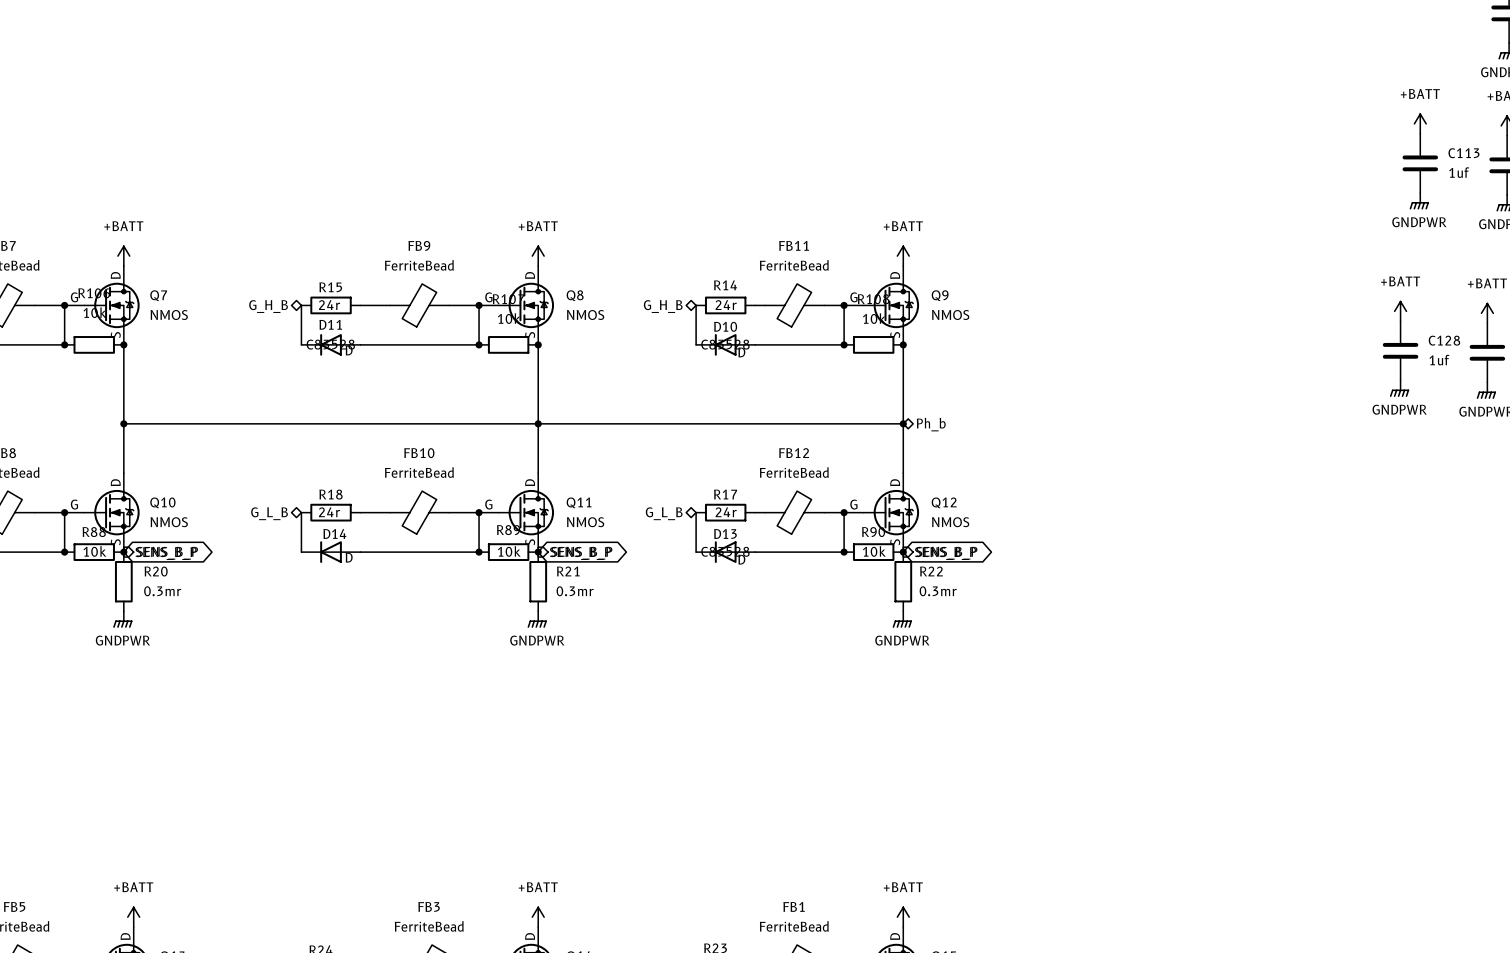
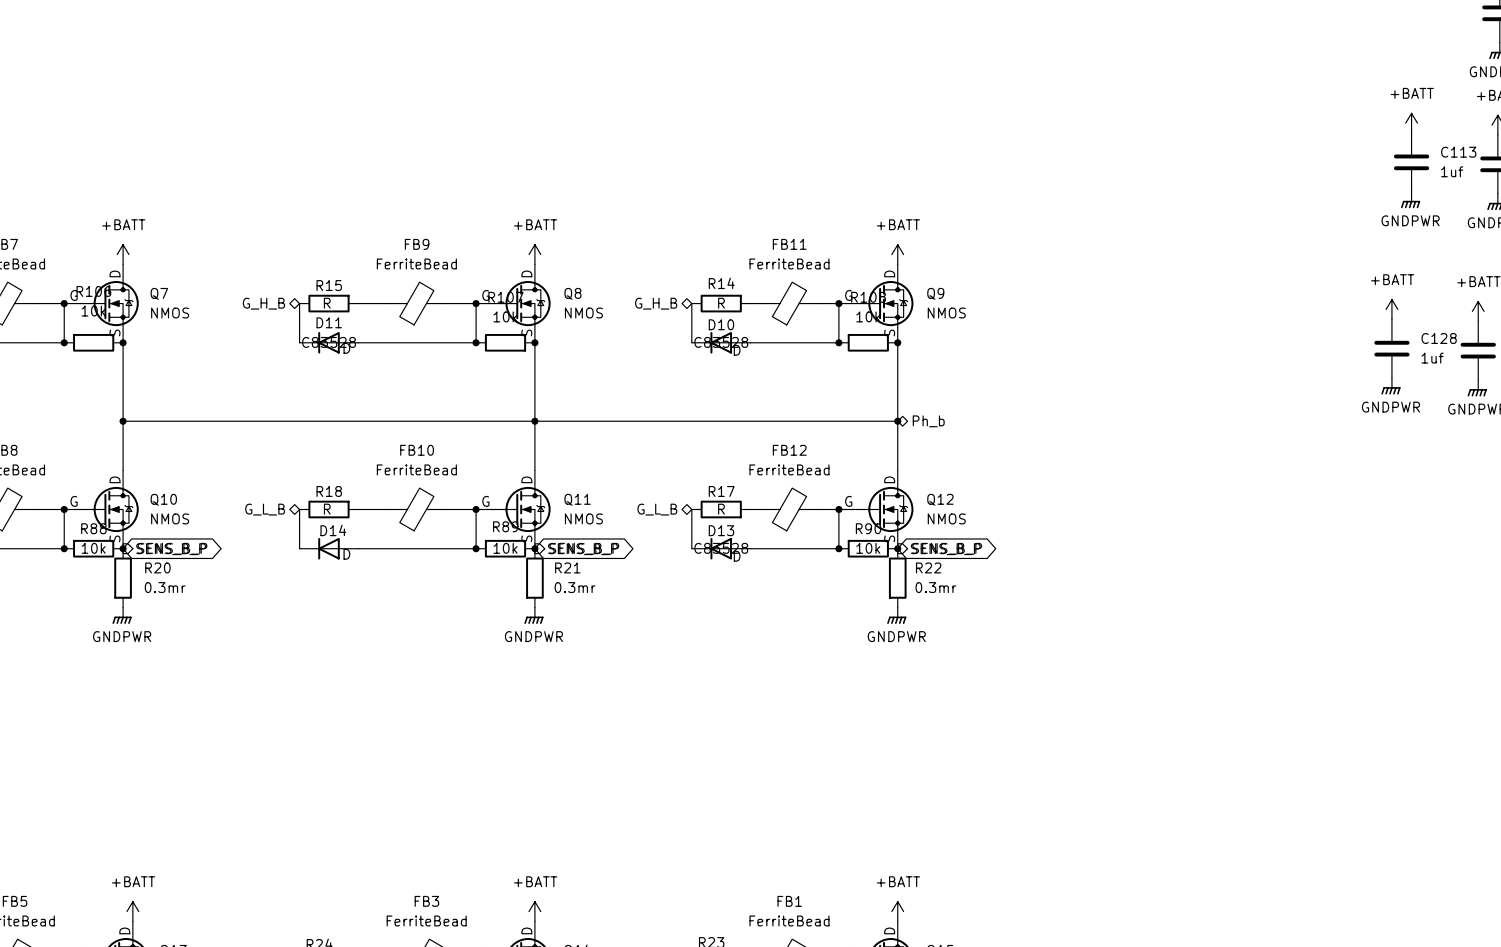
R15 value: 24r (329, 305) -> R (327, 303)
R14 value: 24r (726, 305) -> R (721, 303)
R18 value: 24r (329, 512) -> R (327, 509)
R17 value: 24r (726, 512) -> R (721, 509)

